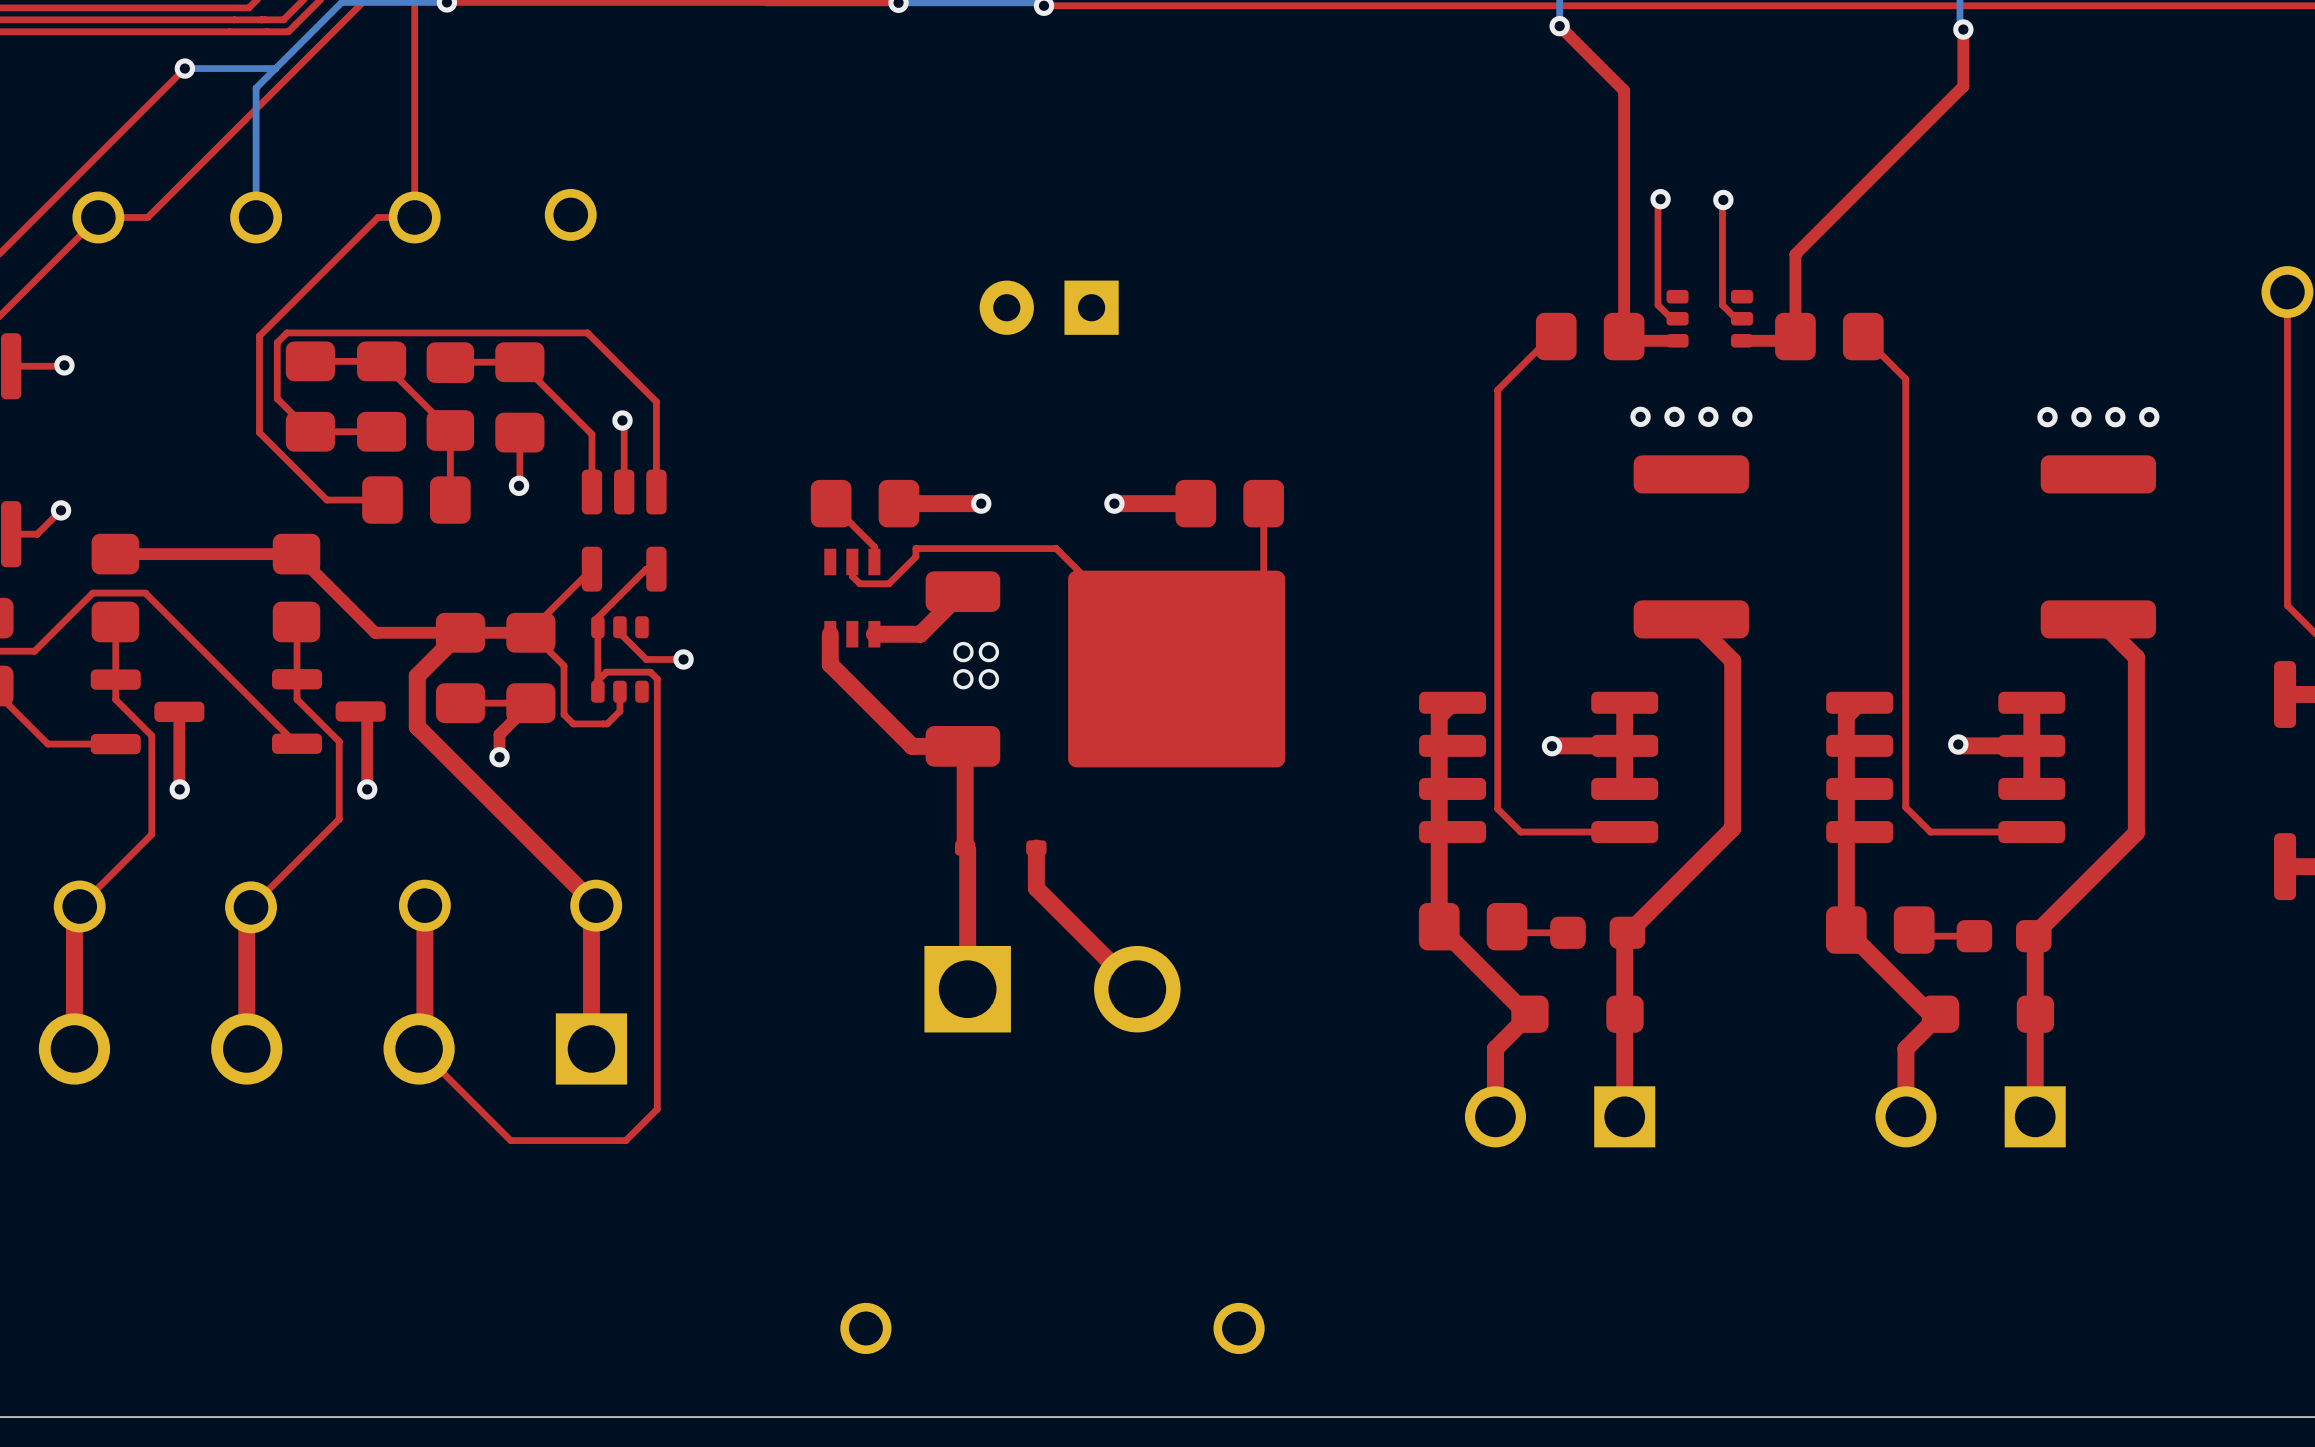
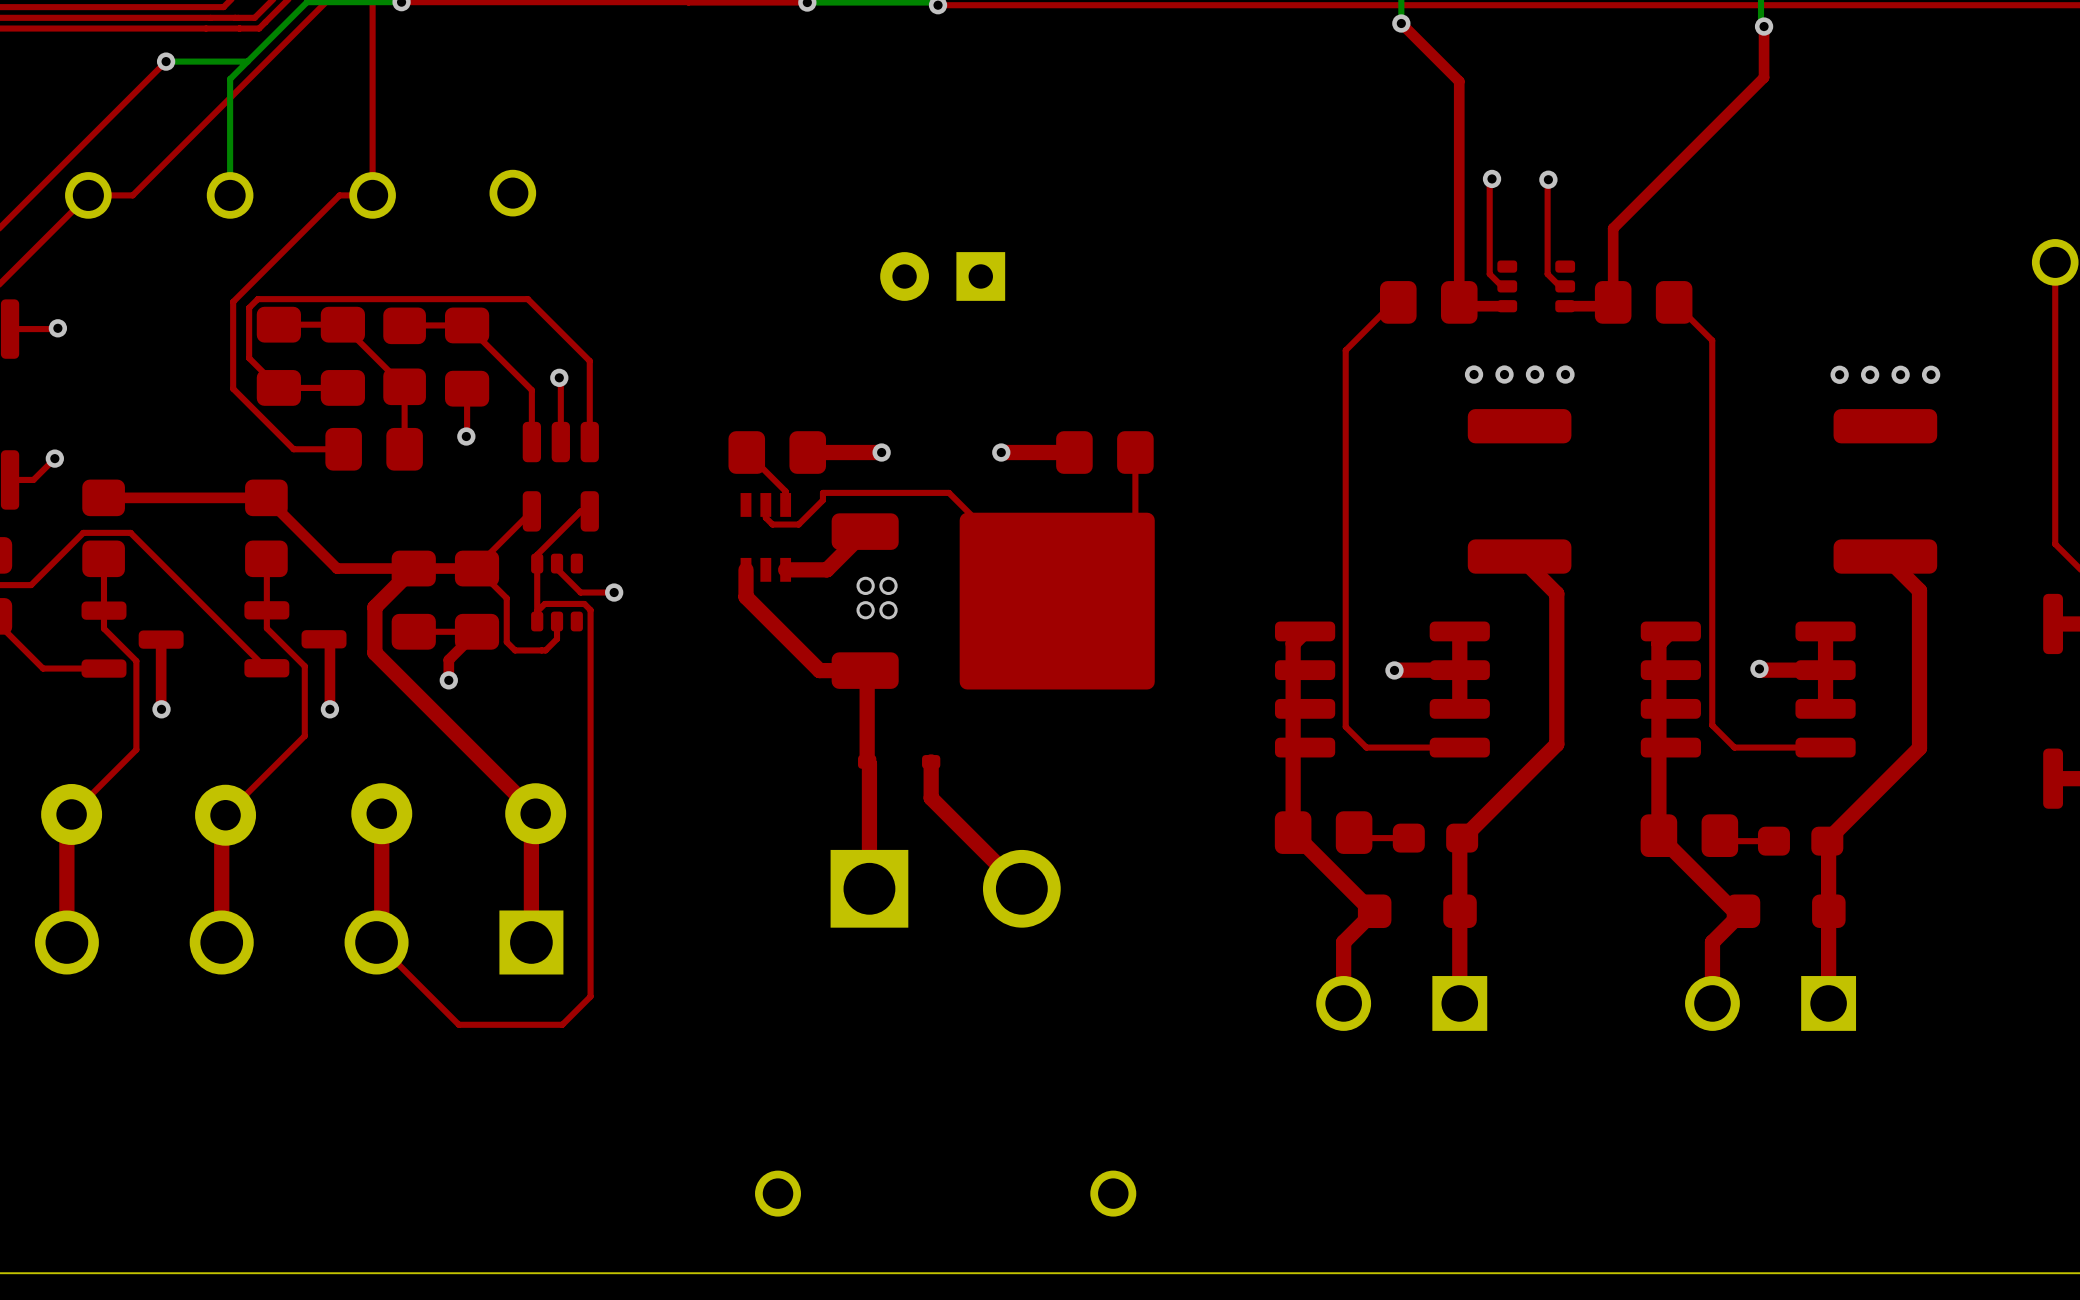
part footprint: [398, 879, 451, 932] -> [351, 783, 413, 845]
part footprint: [570, 879, 623, 932] -> [505, 783, 567, 845]
part footprint: [53, 880, 106, 933] -> [41, 783, 103, 845]
part footprint: [225, 881, 277, 934] -> [195, 784, 257, 846]

